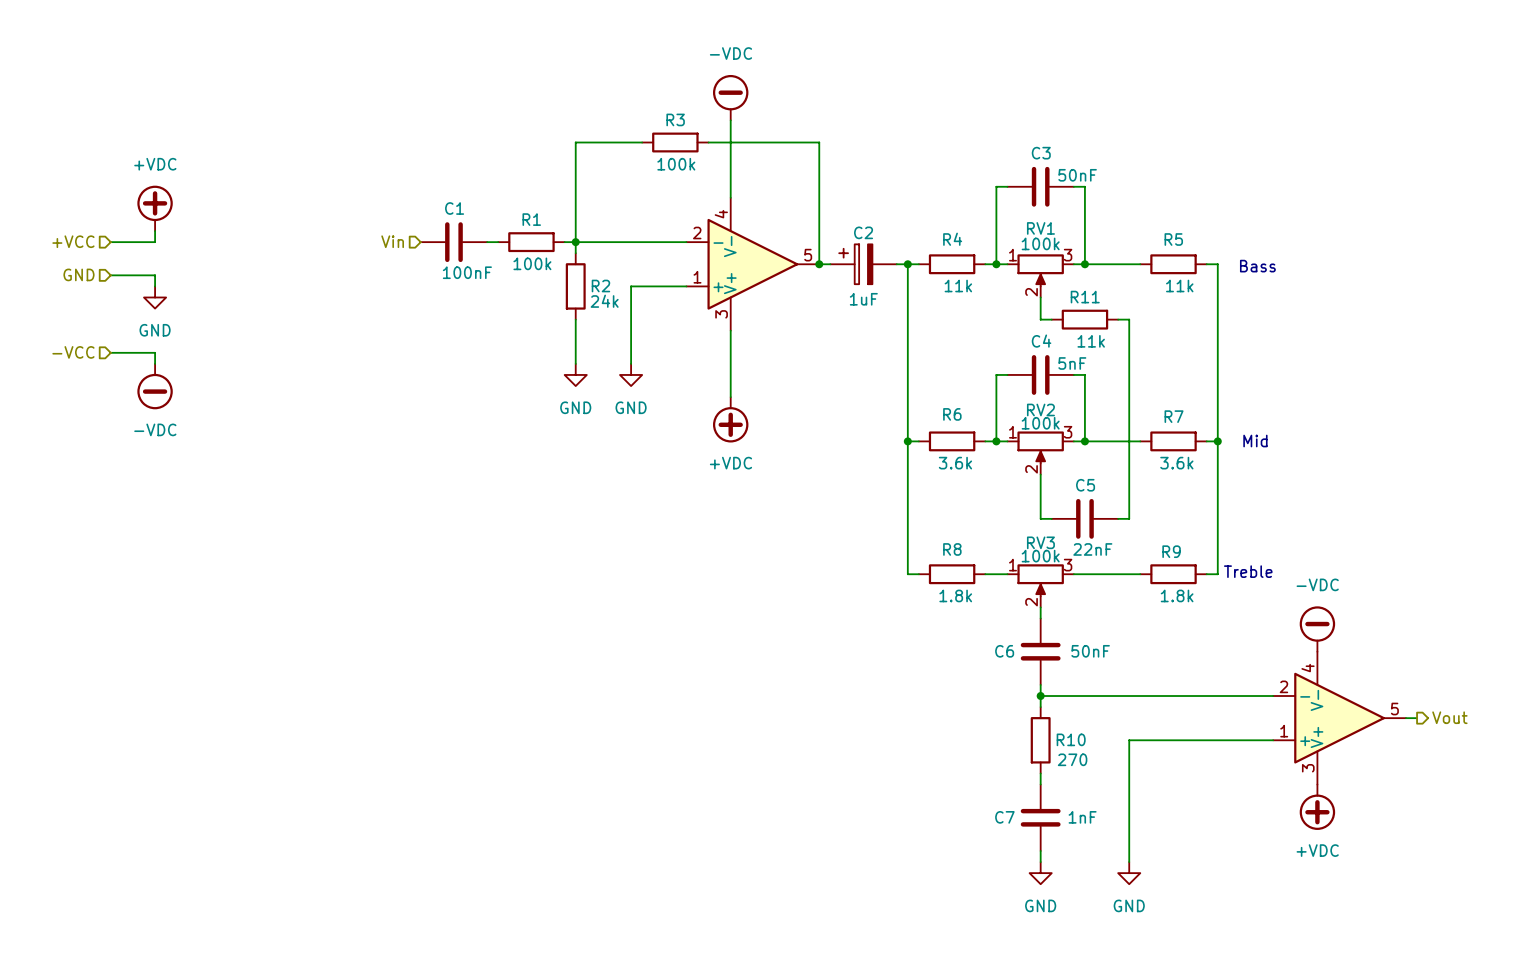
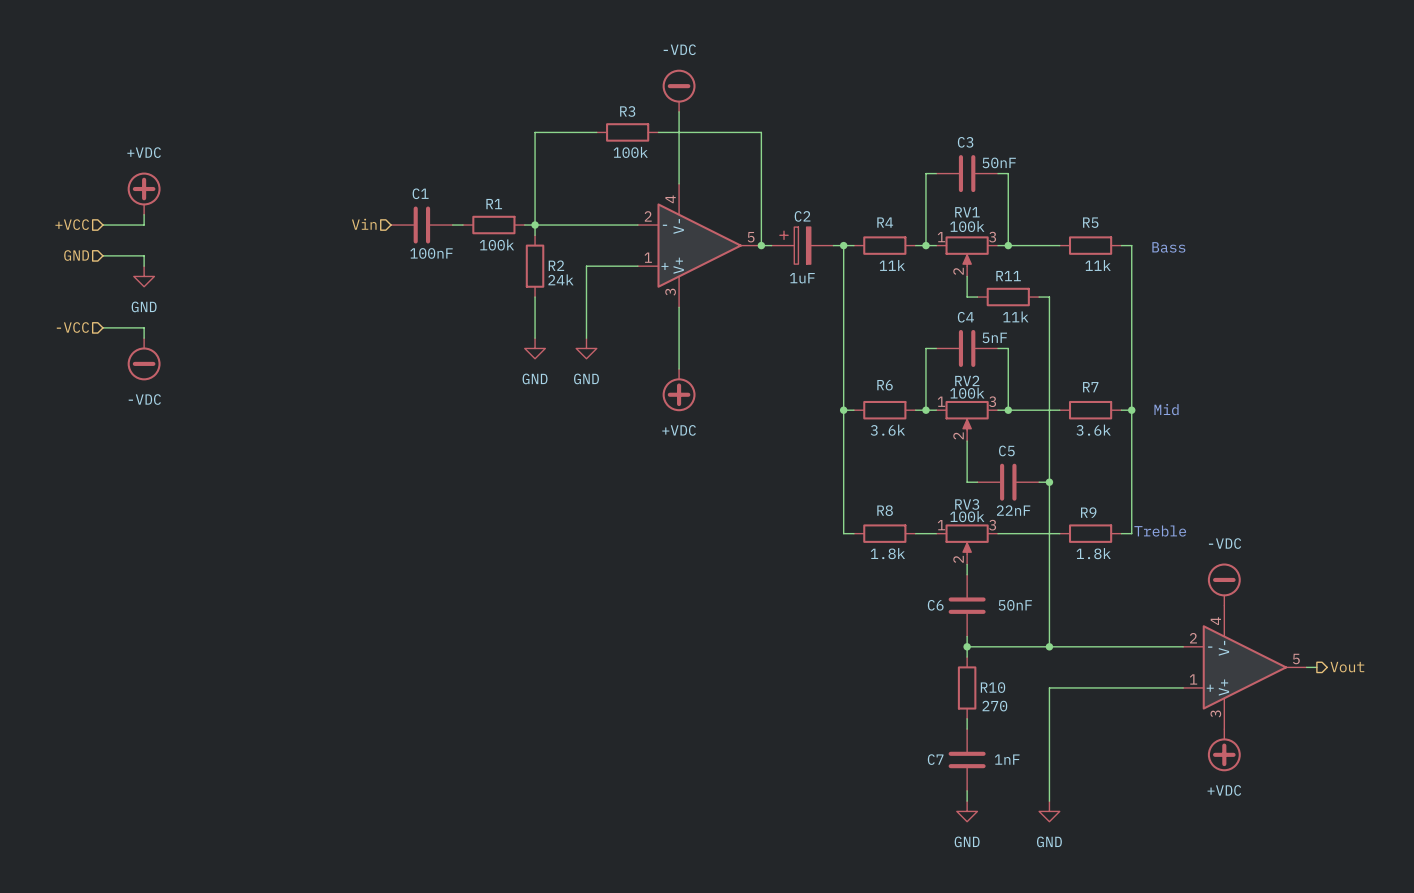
wire: none -> (1049, 482) (1049, 646)
junction: none -> (1049, 482)
junction: none -> (1049, 646)

